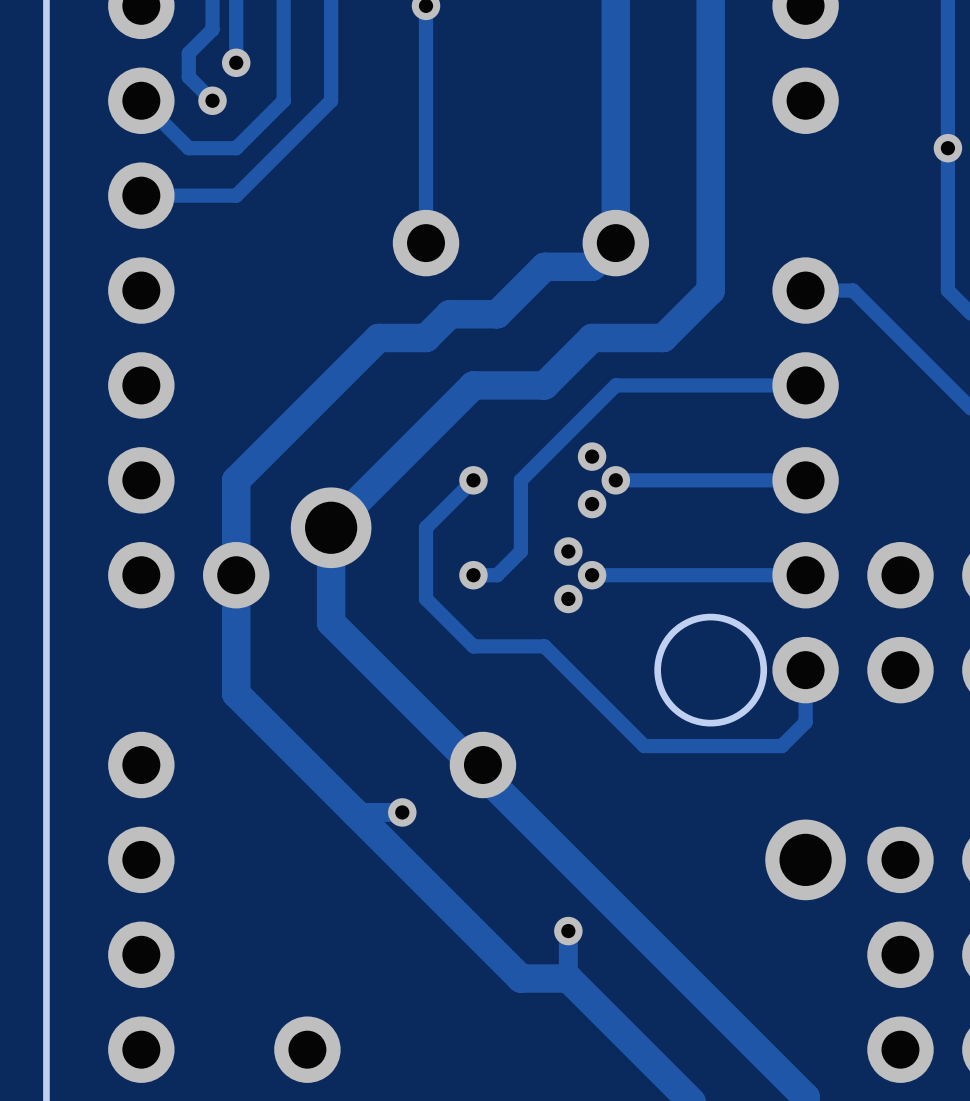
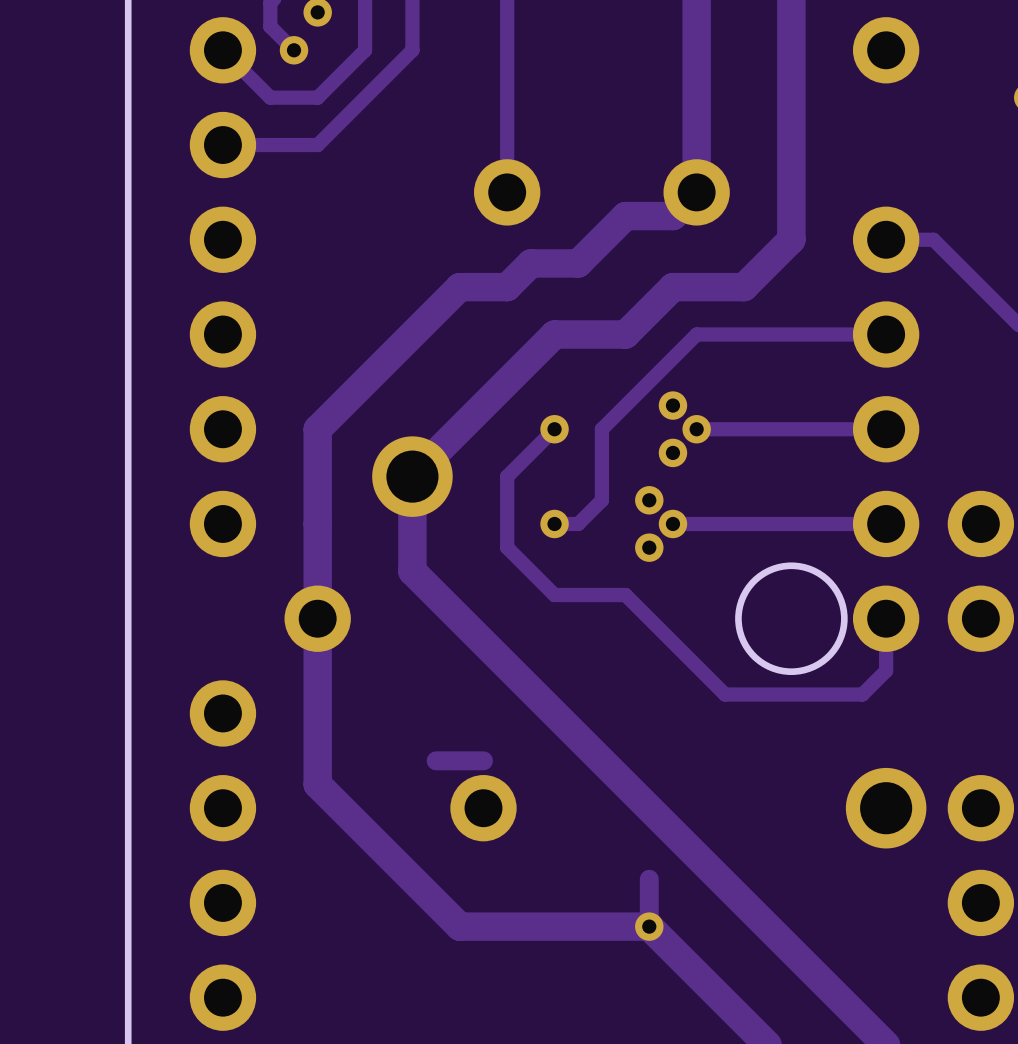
via position: (236, 575) -> (317, 618)
track: (236, 693) (520, 978) -> (317, 642) (317, 784) (459, 926) (601, 926)
via: (482, 765) -> none
via: (402, 812) -> none
via: none -> (483, 808)
via position: (568, 931) -> (649, 926)
via: (307, 1049) -> none

